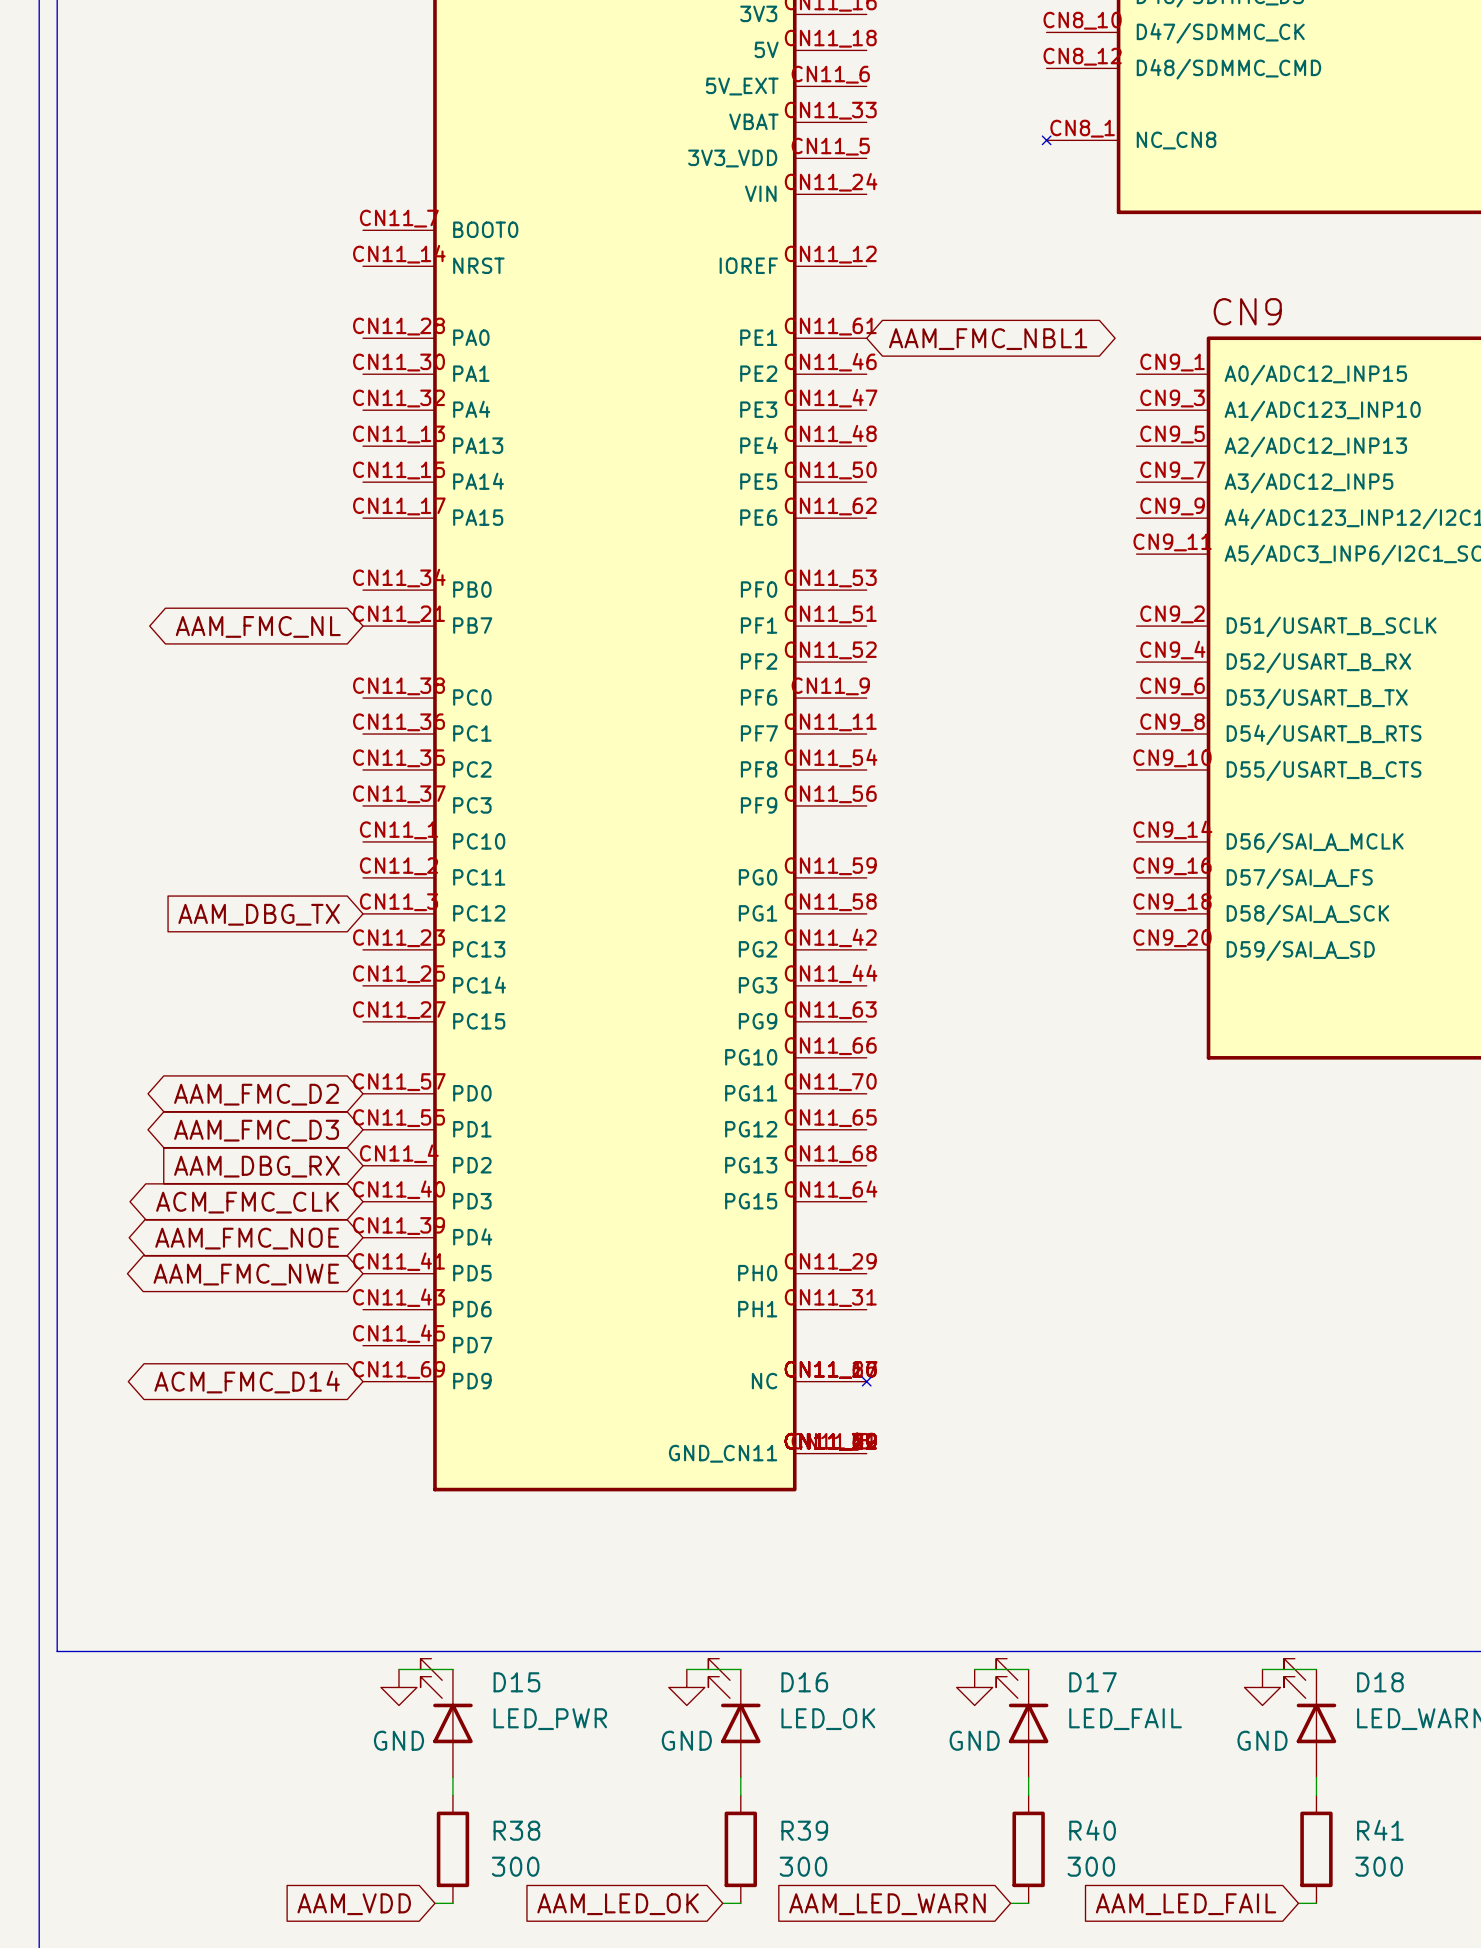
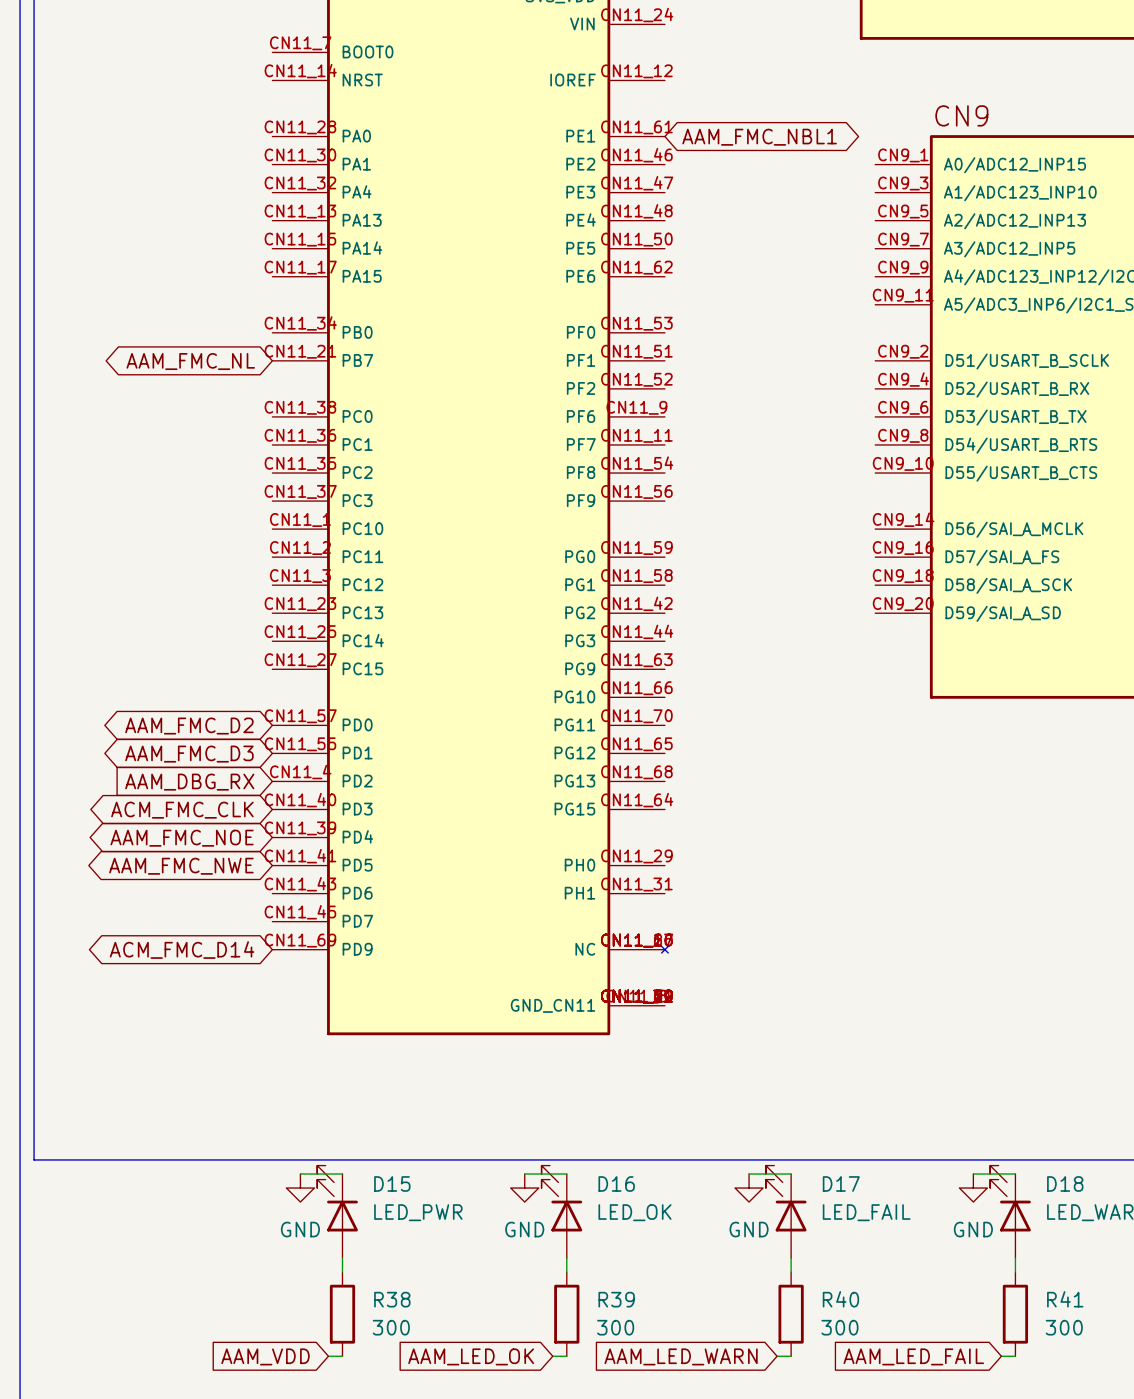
global label: AAM_DBG_TX (259, 914) -> none

